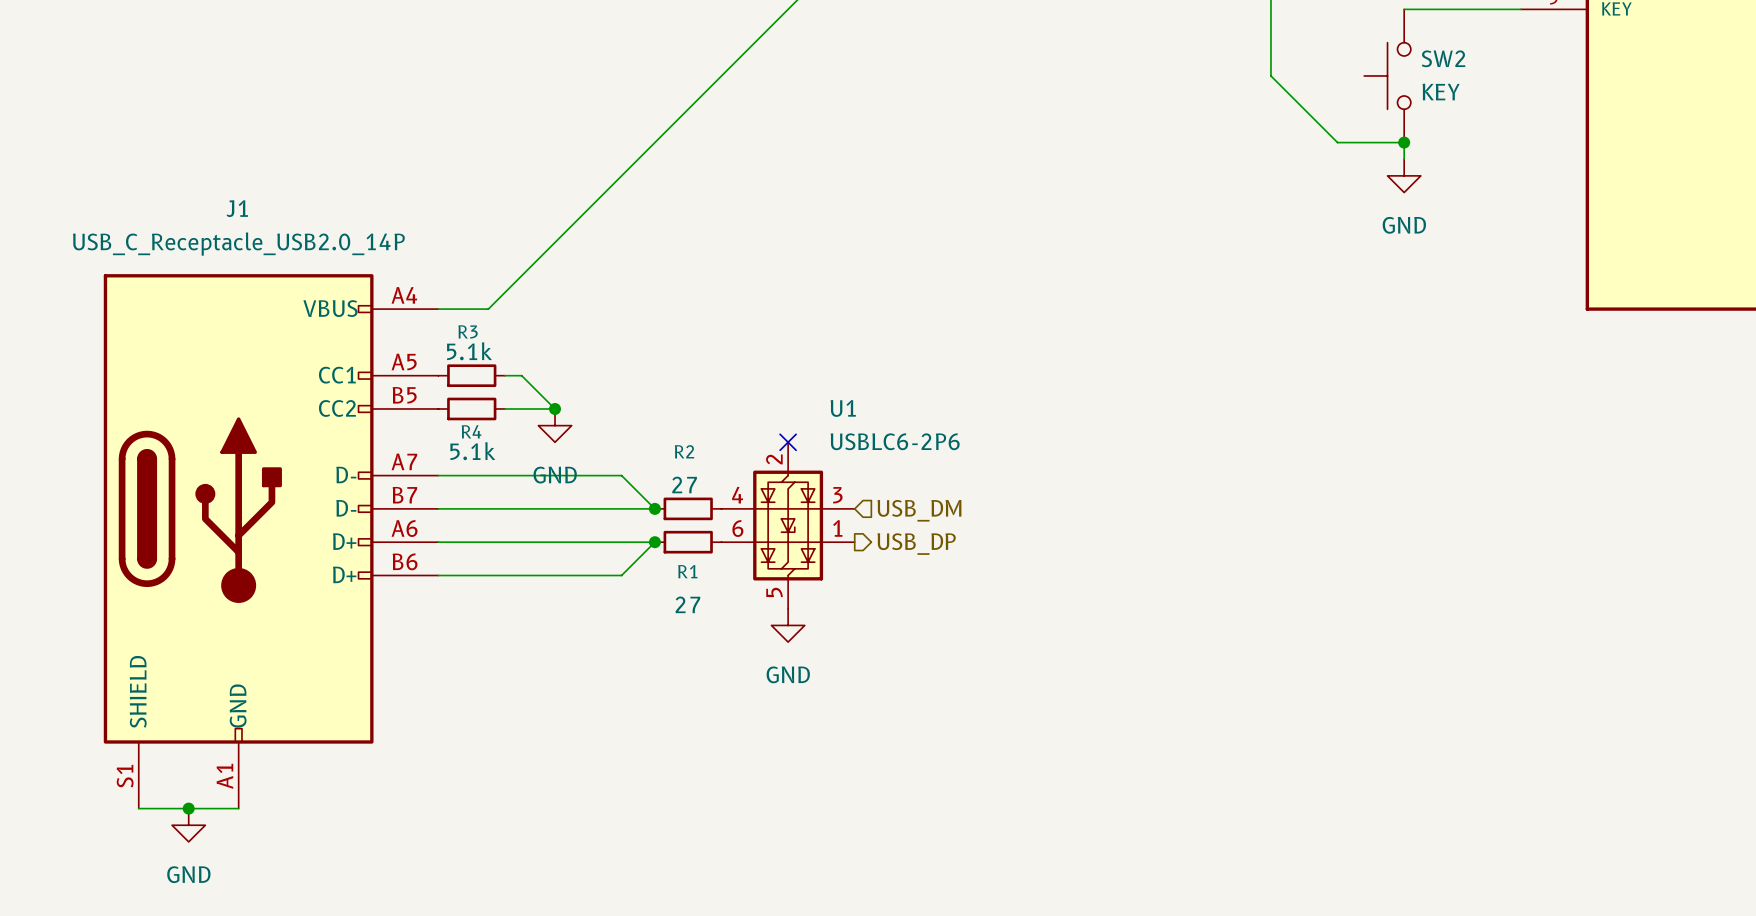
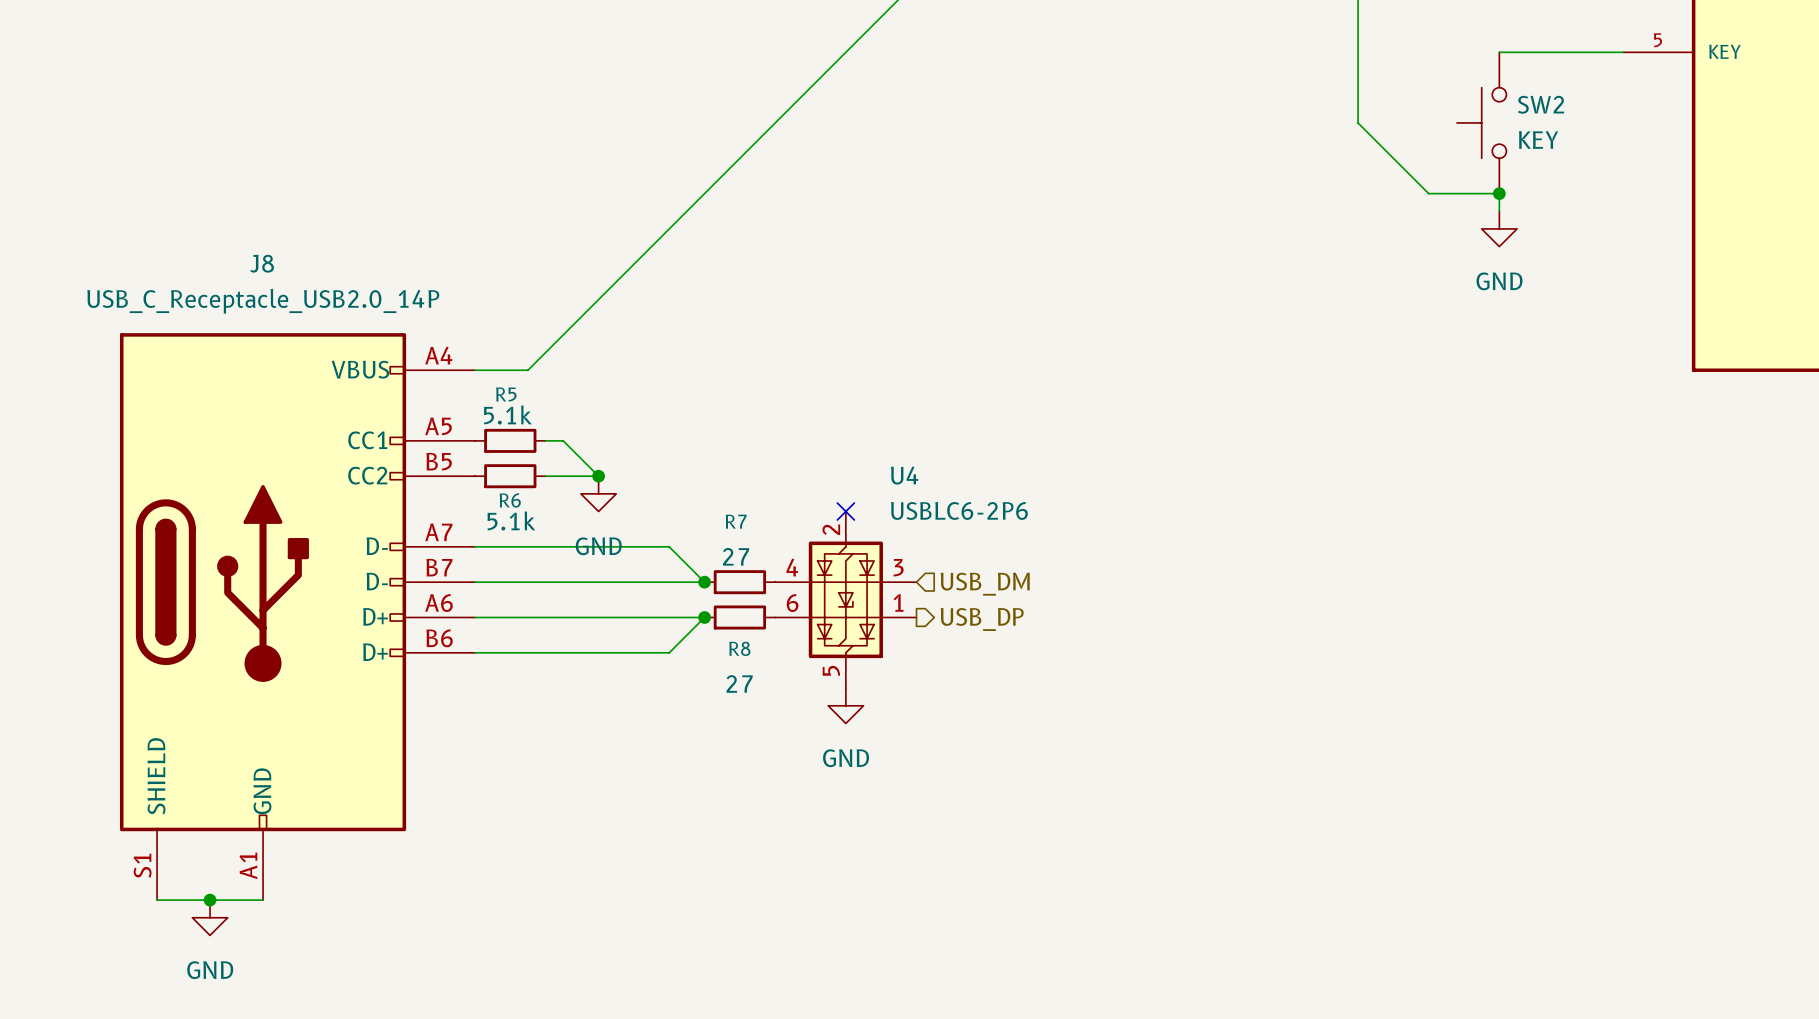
J1 name: J1 (237, 208) -> J8 (262, 263)
R3 name: R3 (468, 331) -> R5 (506, 394)
U1 name: U1 (843, 408) -> U4 (904, 475)
R4 name: R4 (471, 431) -> R6 (510, 500)
R2 name: R2 (684, 451) -> R7 (736, 521)
R1 name: R1 (687, 571) -> R8 (739, 648)

